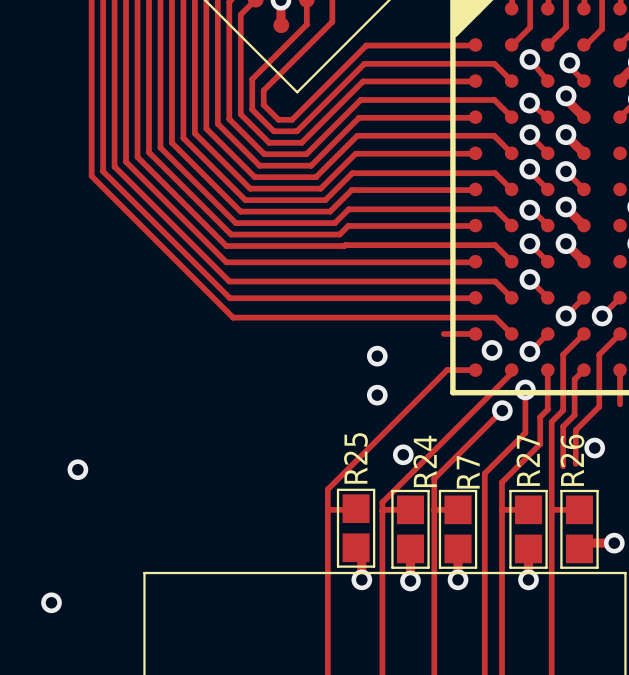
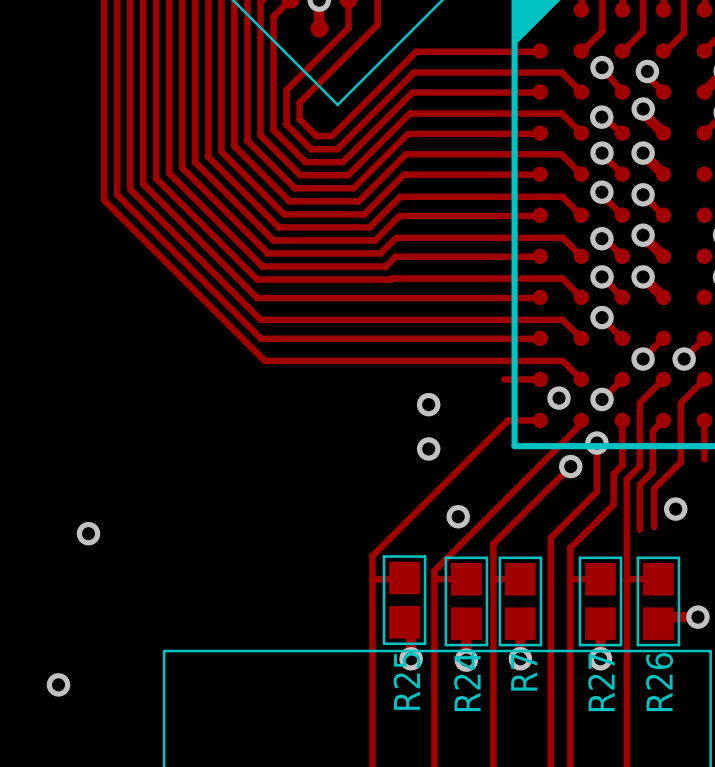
R25 name position: R25 (355, 458) -> R25 (407, 681)
R27 name position: R27 (528, 460) -> R27 (601, 682)
R26 name position: R26 (572, 460) -> R26 (659, 682)
R24 name position: R24 (425, 461) -> R24 (467, 681)
R7 name position: R7 (468, 472) -> R7 (524, 672)

